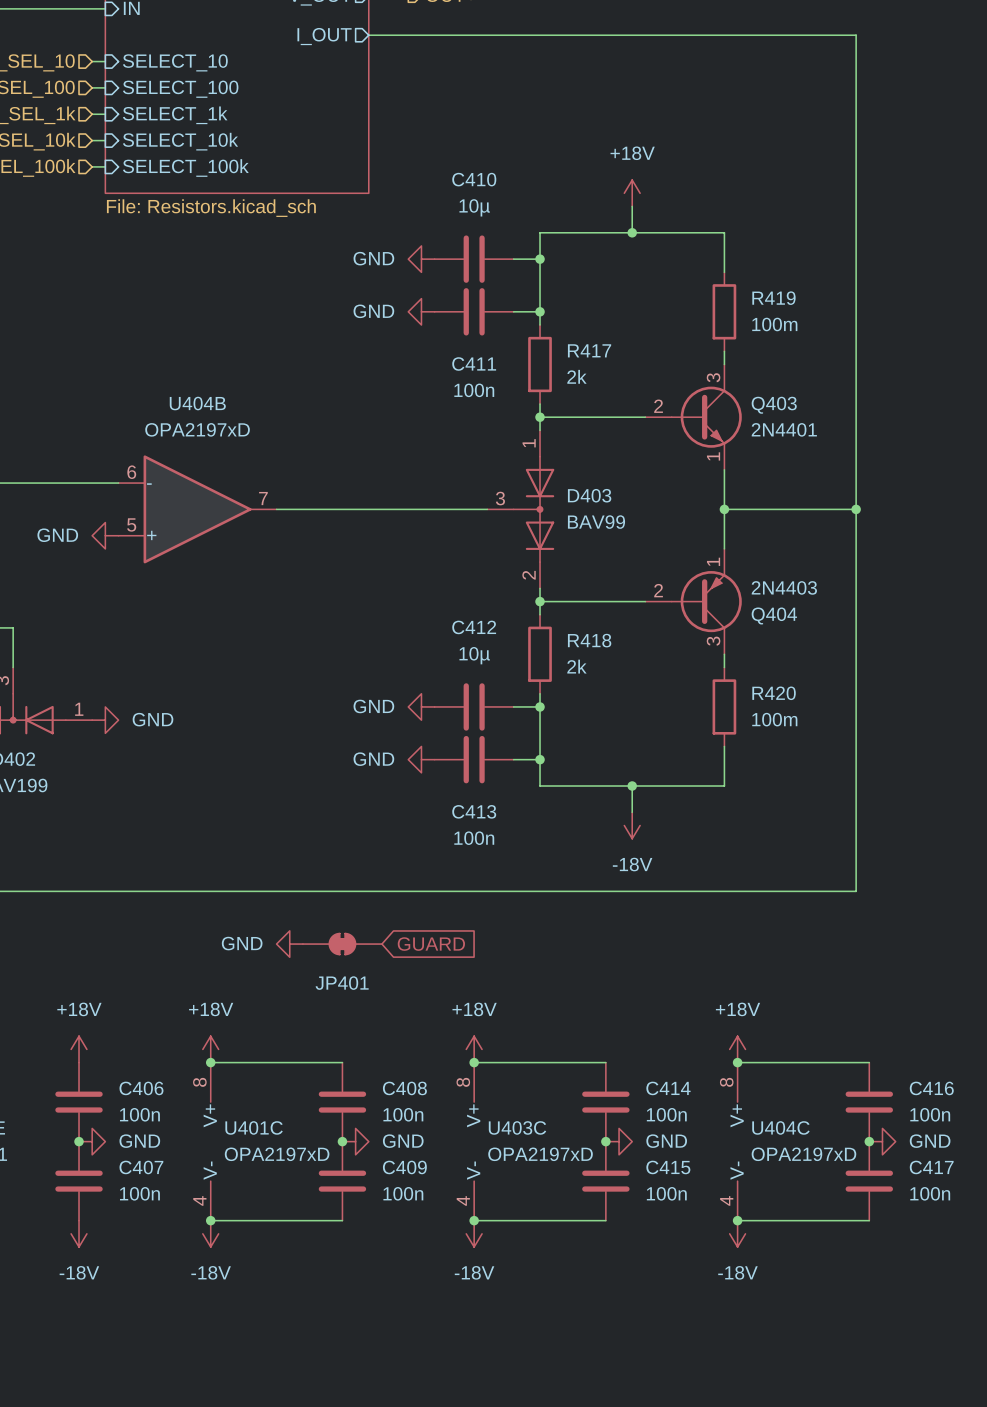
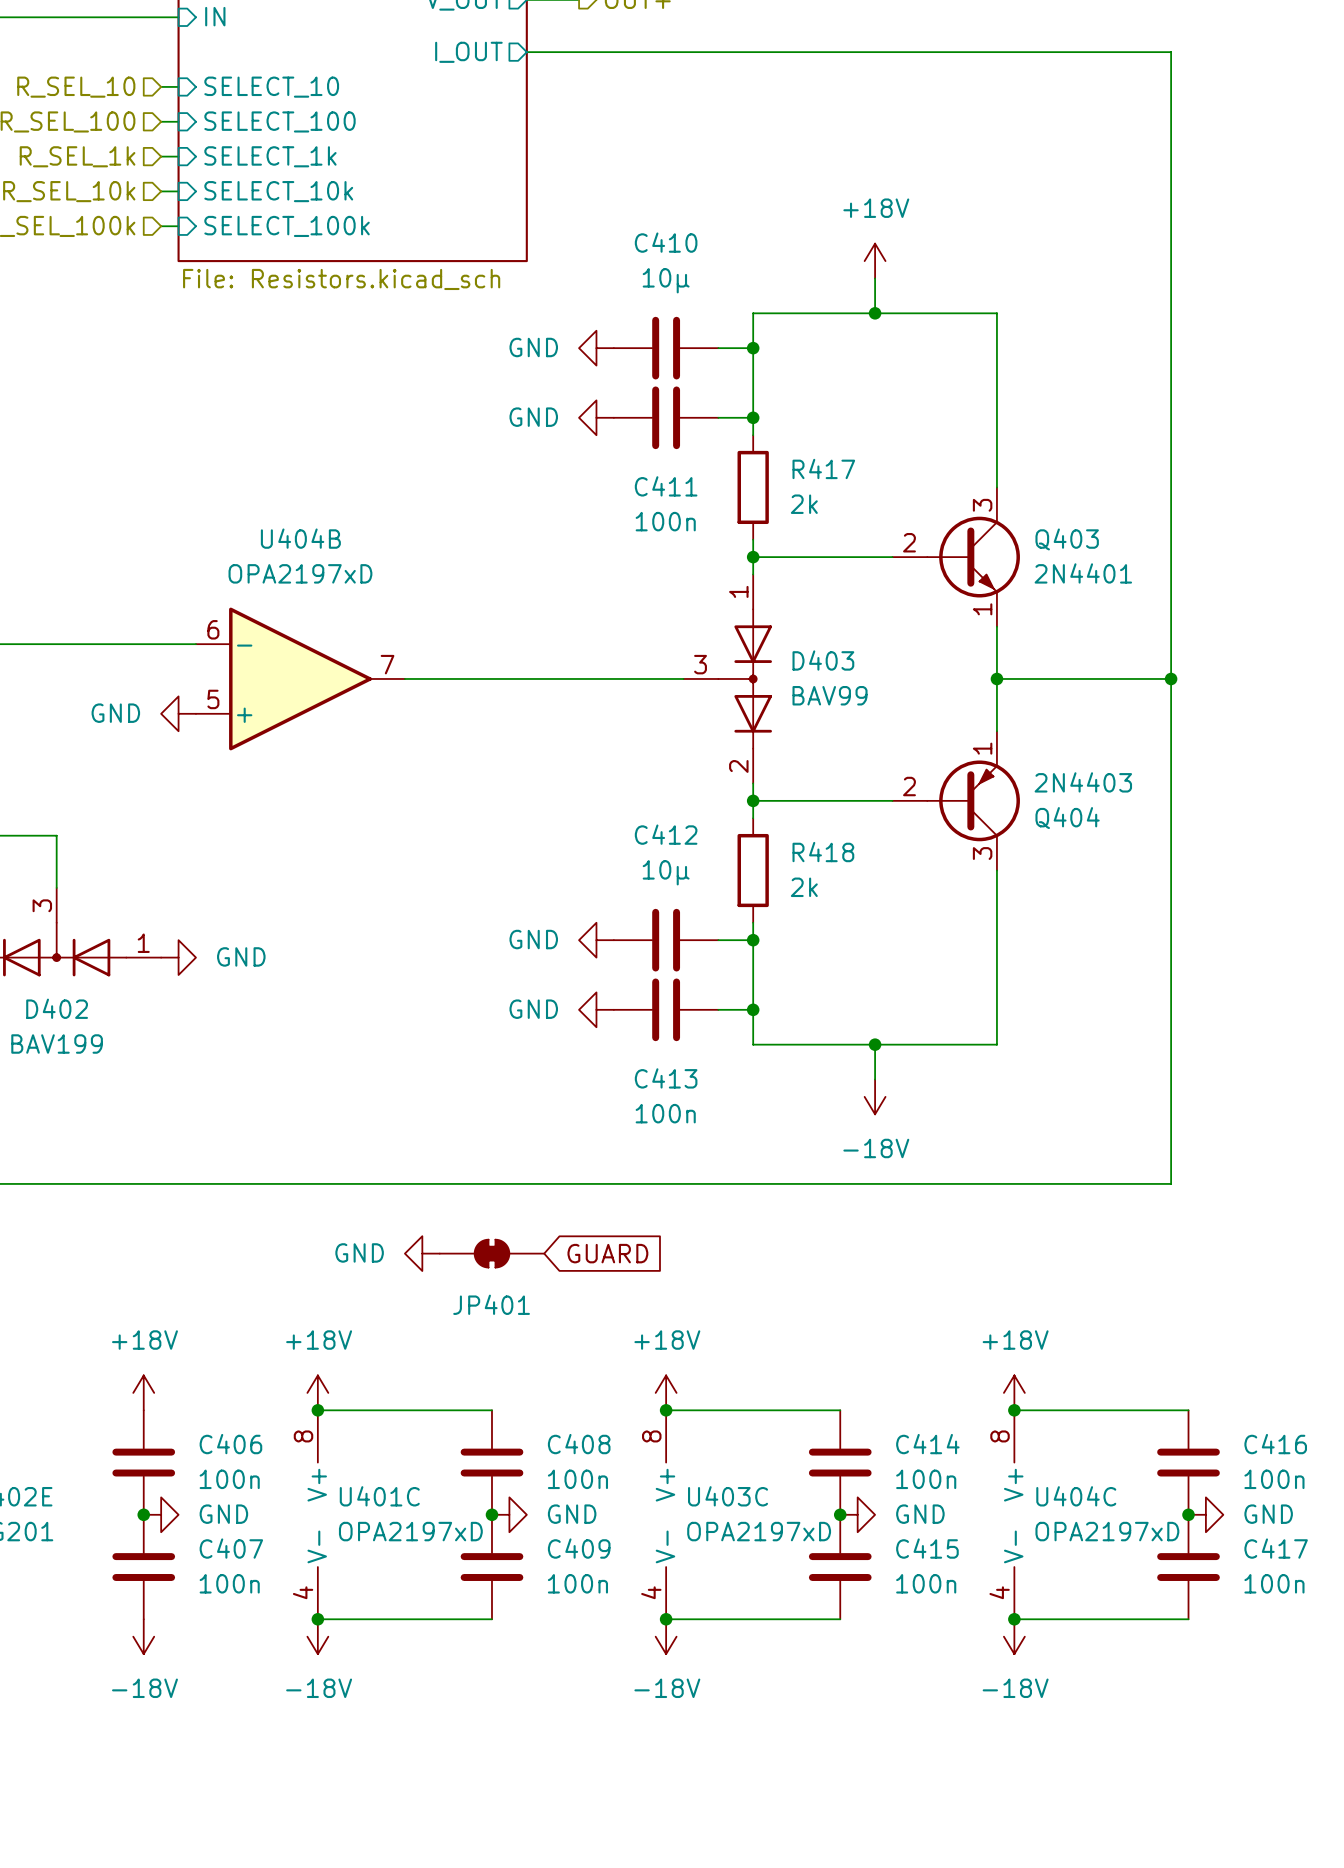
wire: none -> (996, 365) (996, 470)
R419: 100m (724, 311) -> none
wire: none -> (996, 887) (996, 992)
R420: 100m (724, 706) -> none

